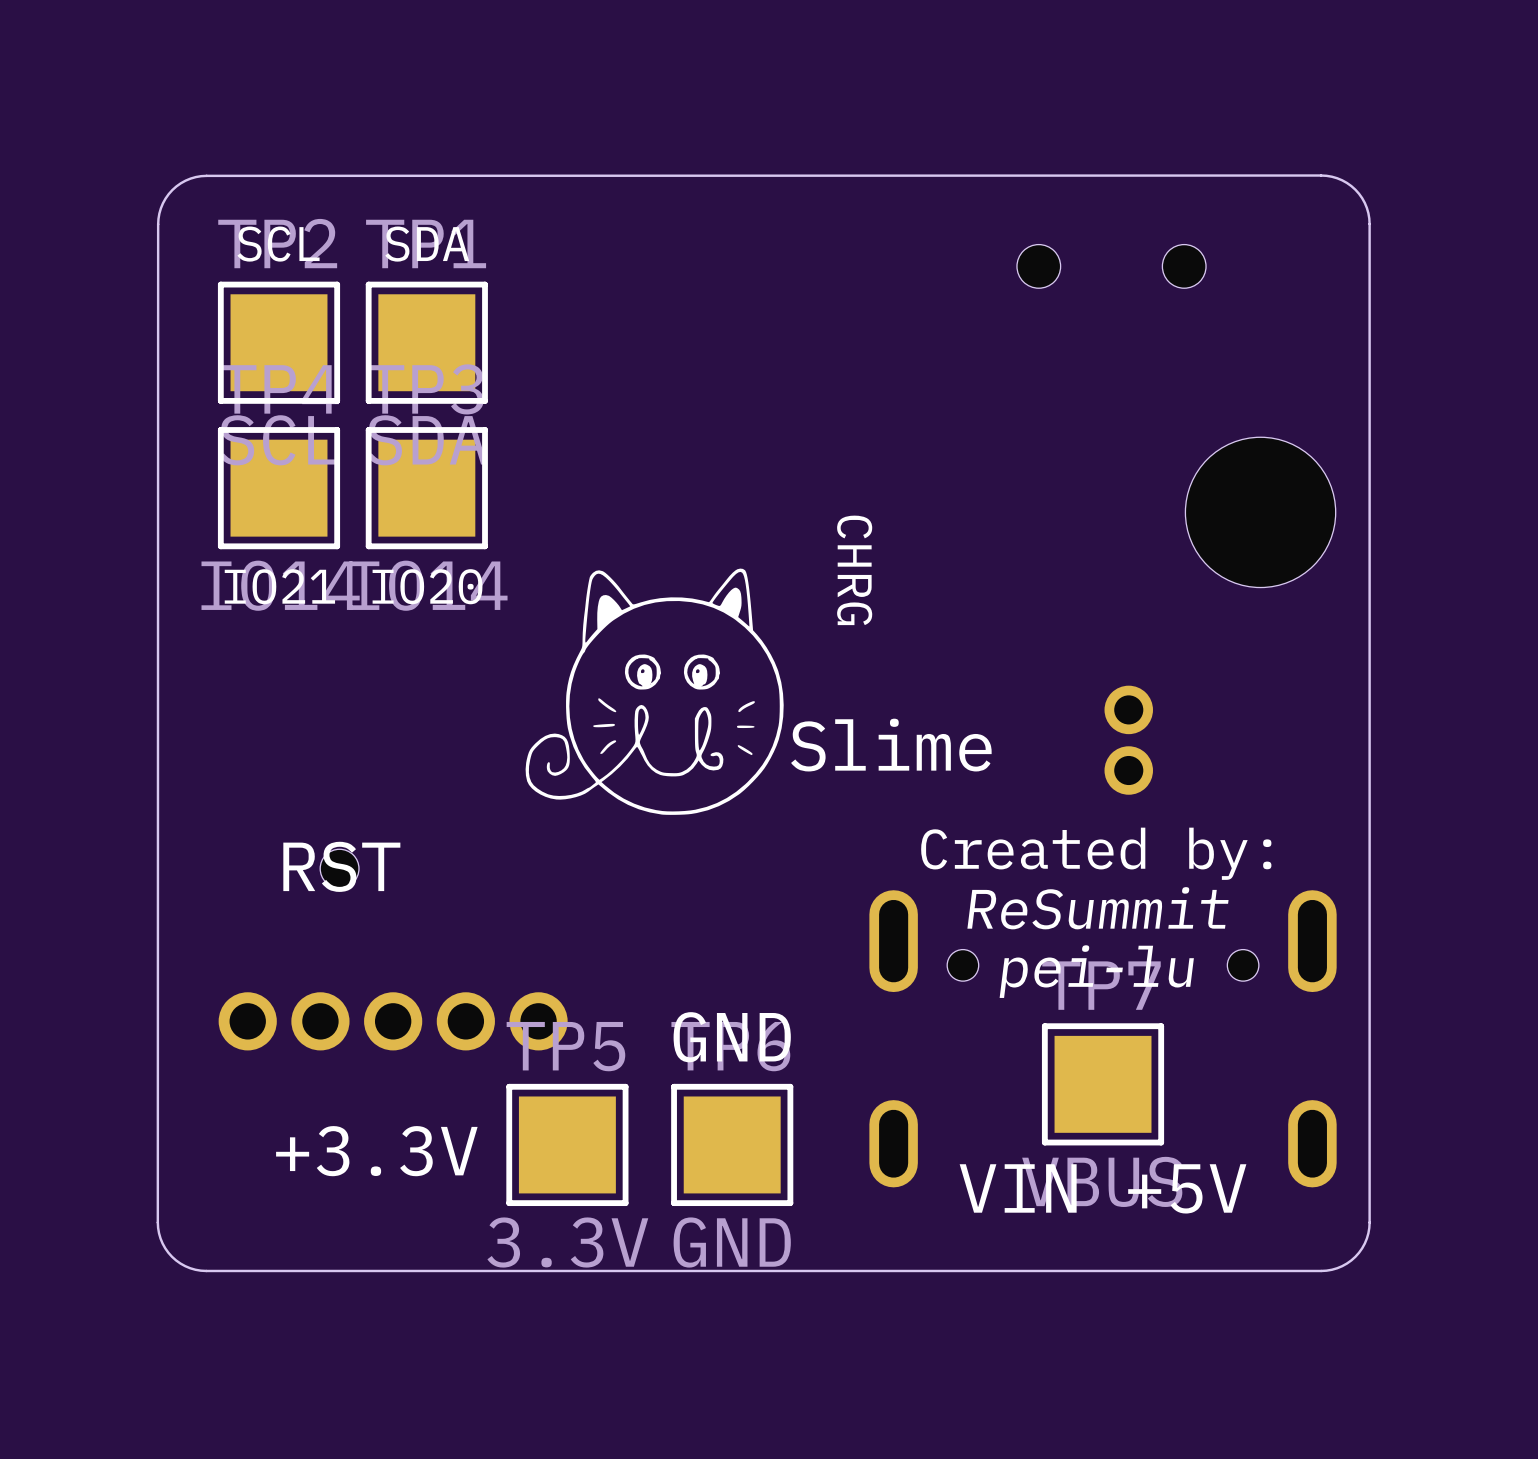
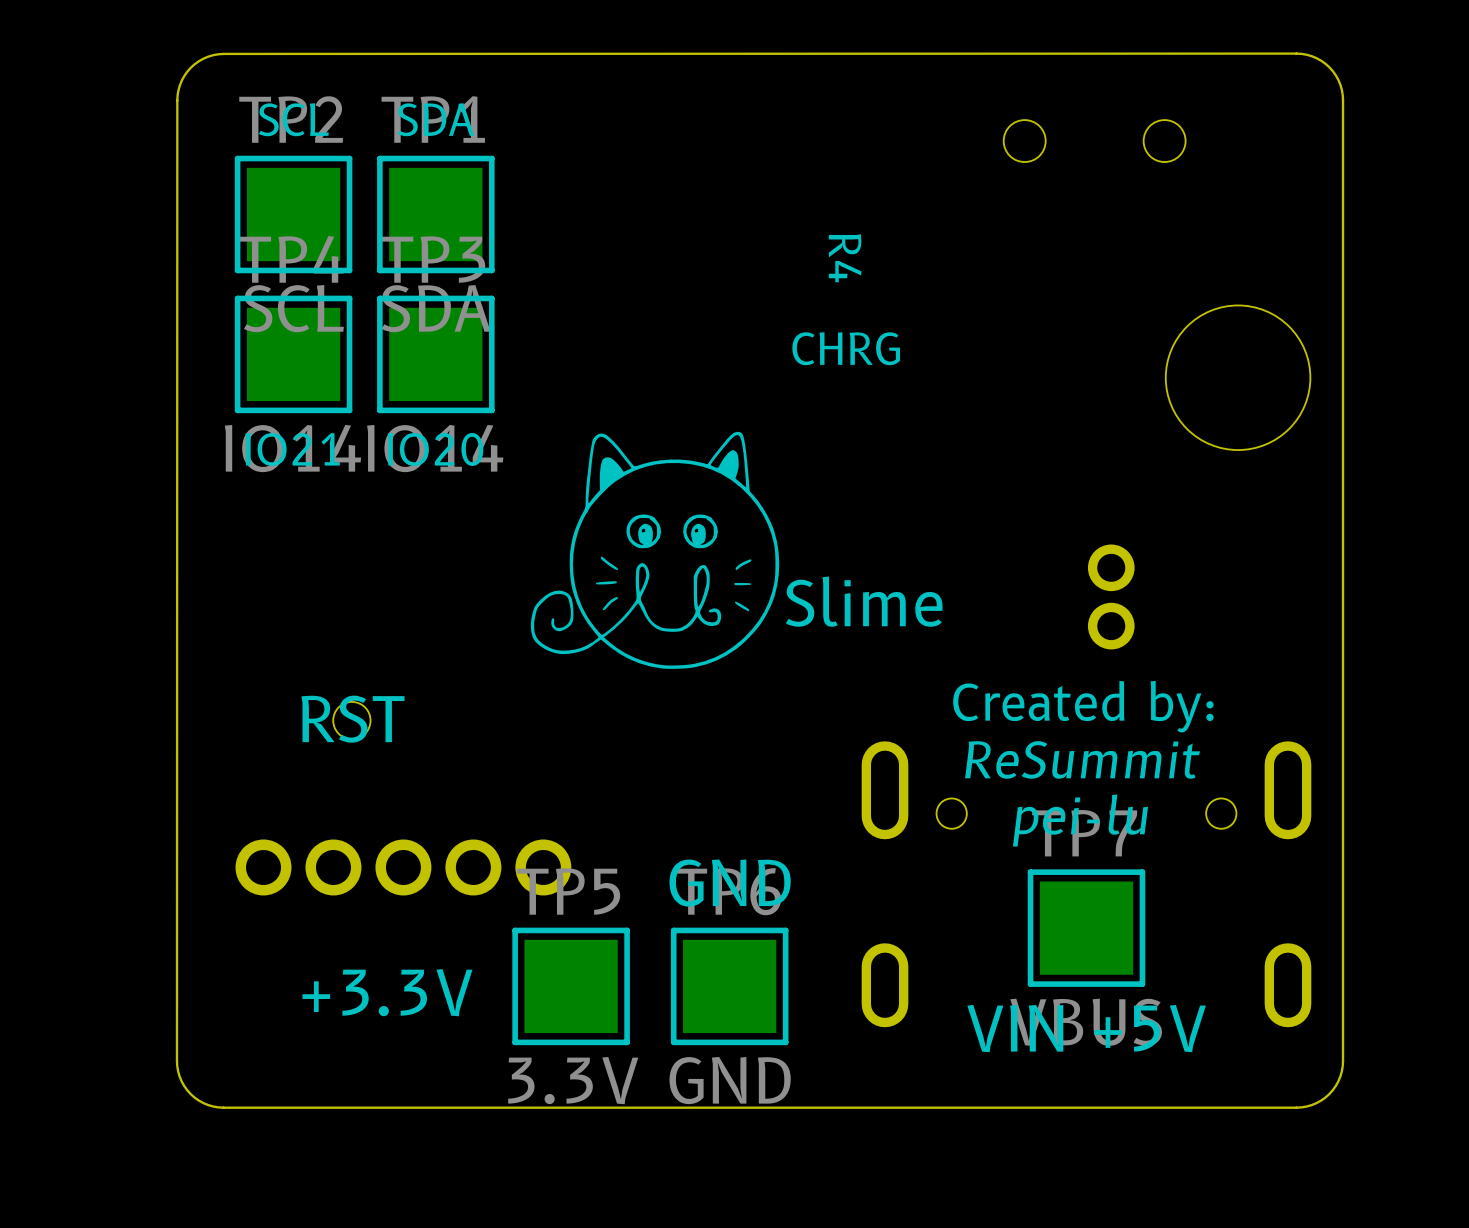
R4: none -> (845, 258)
text rotation: 0° (854, 570) -> 90° counterclockwise (846, 348)

